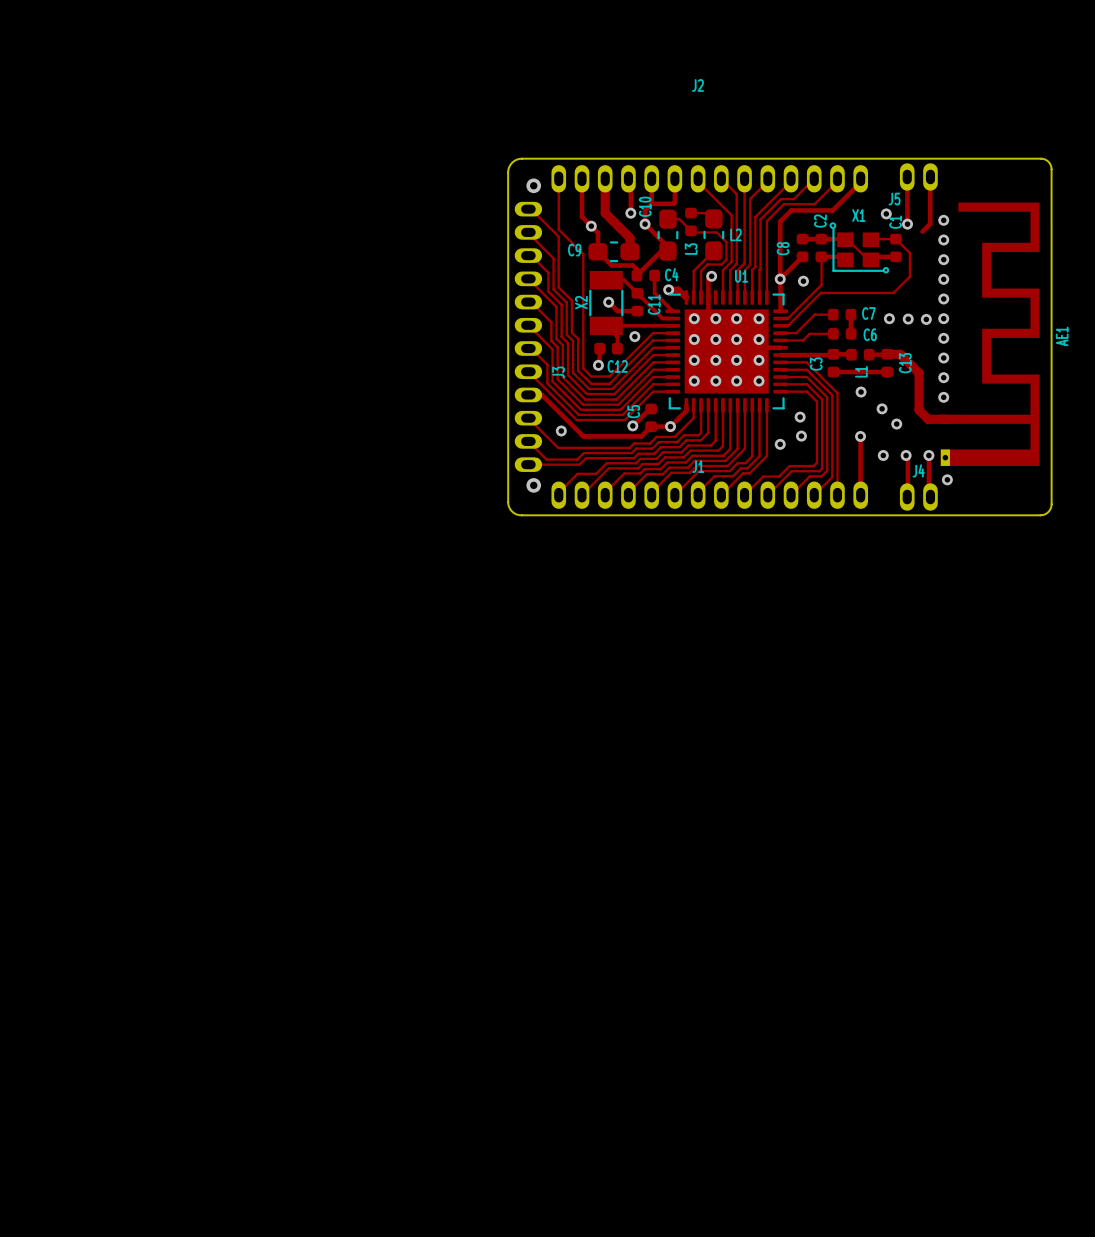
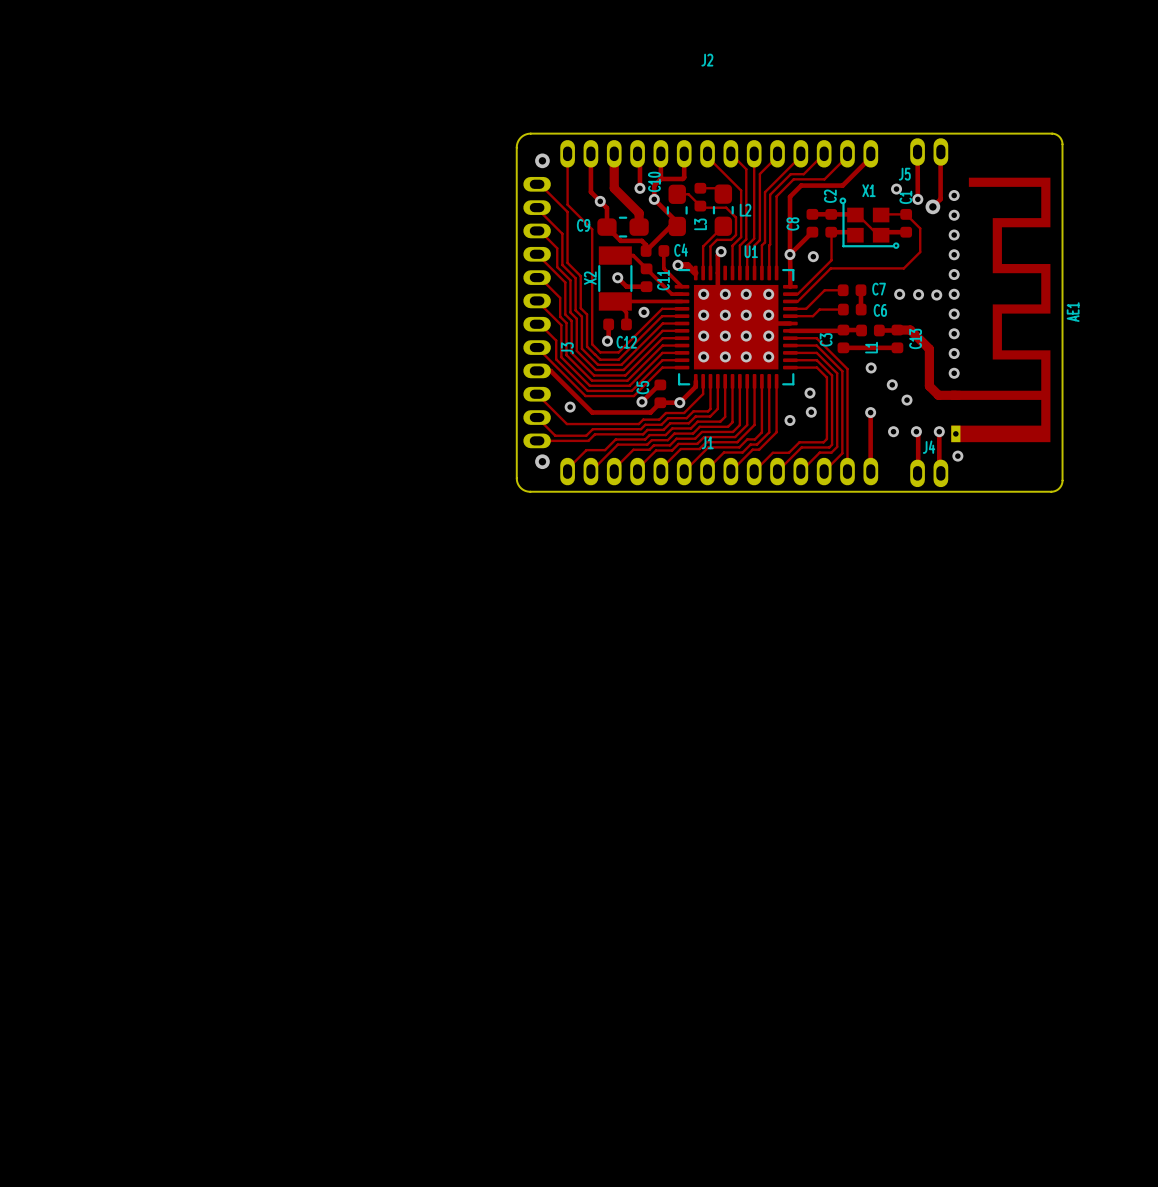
via: none -> (932, 206)

